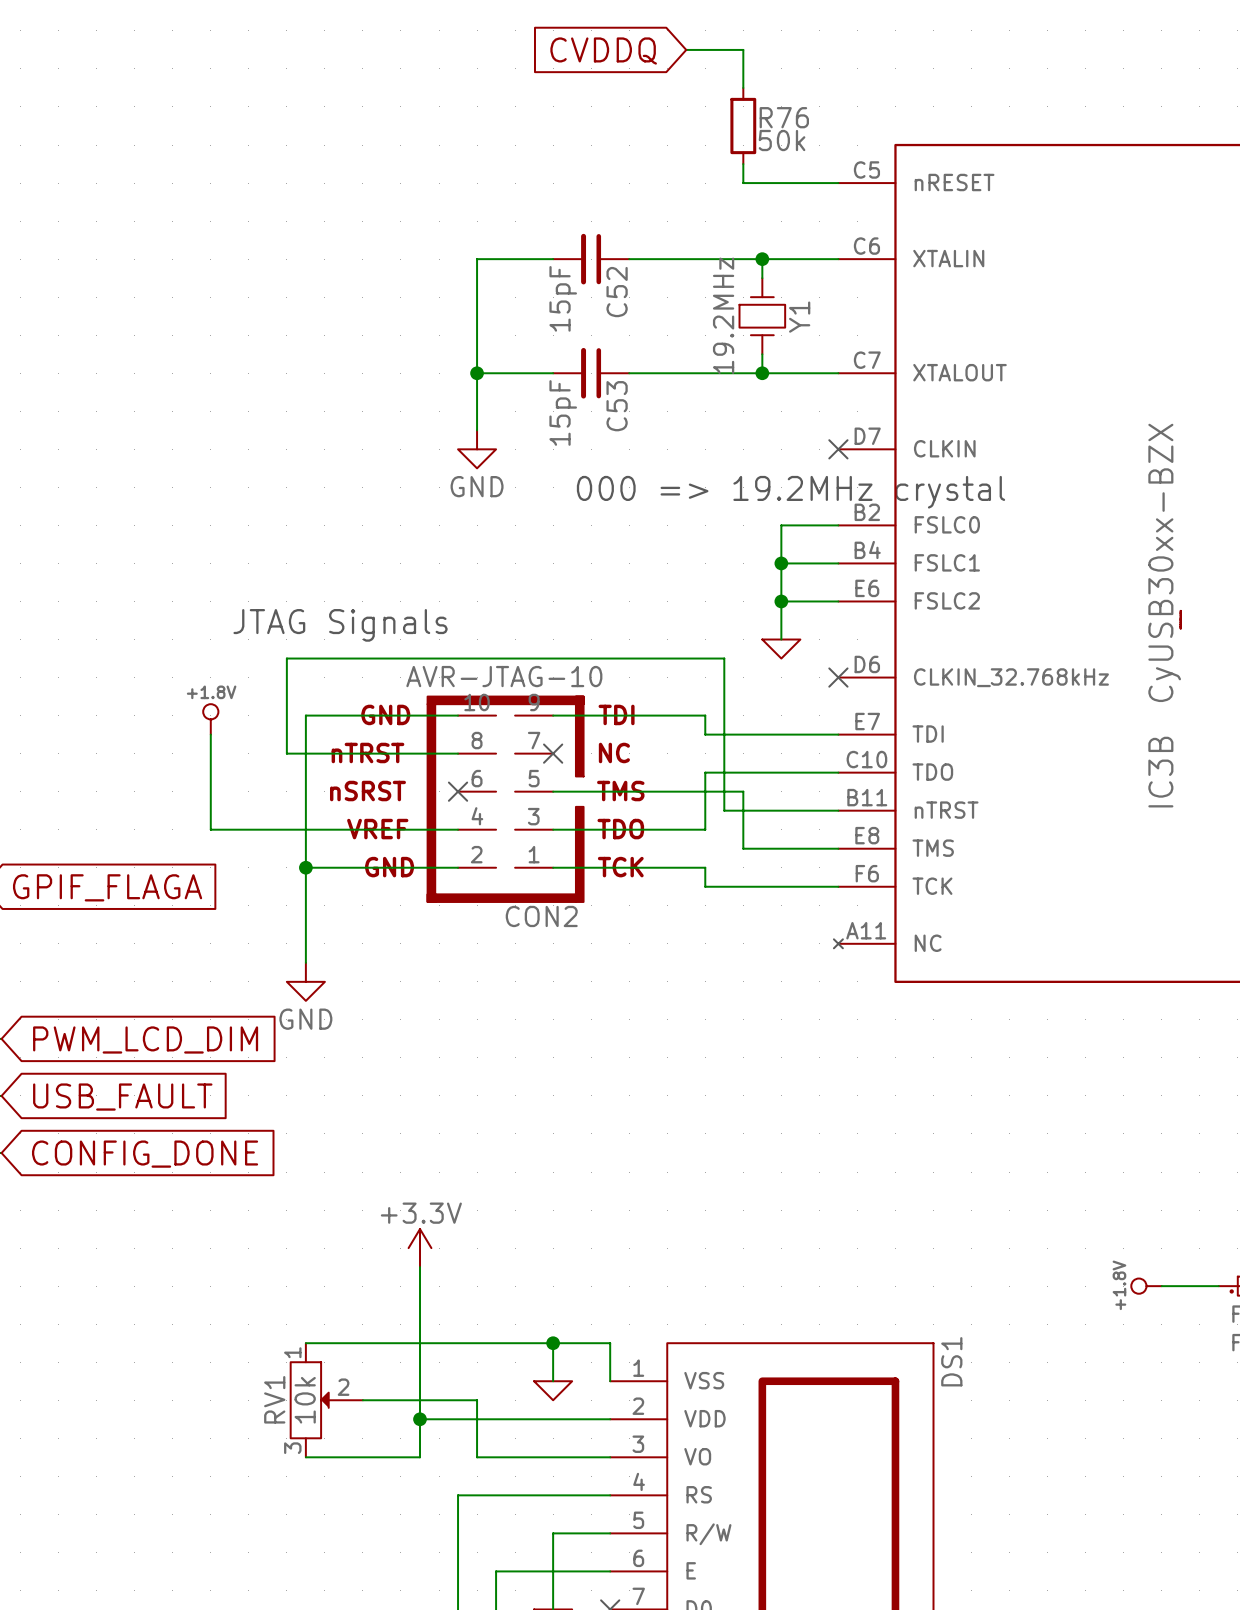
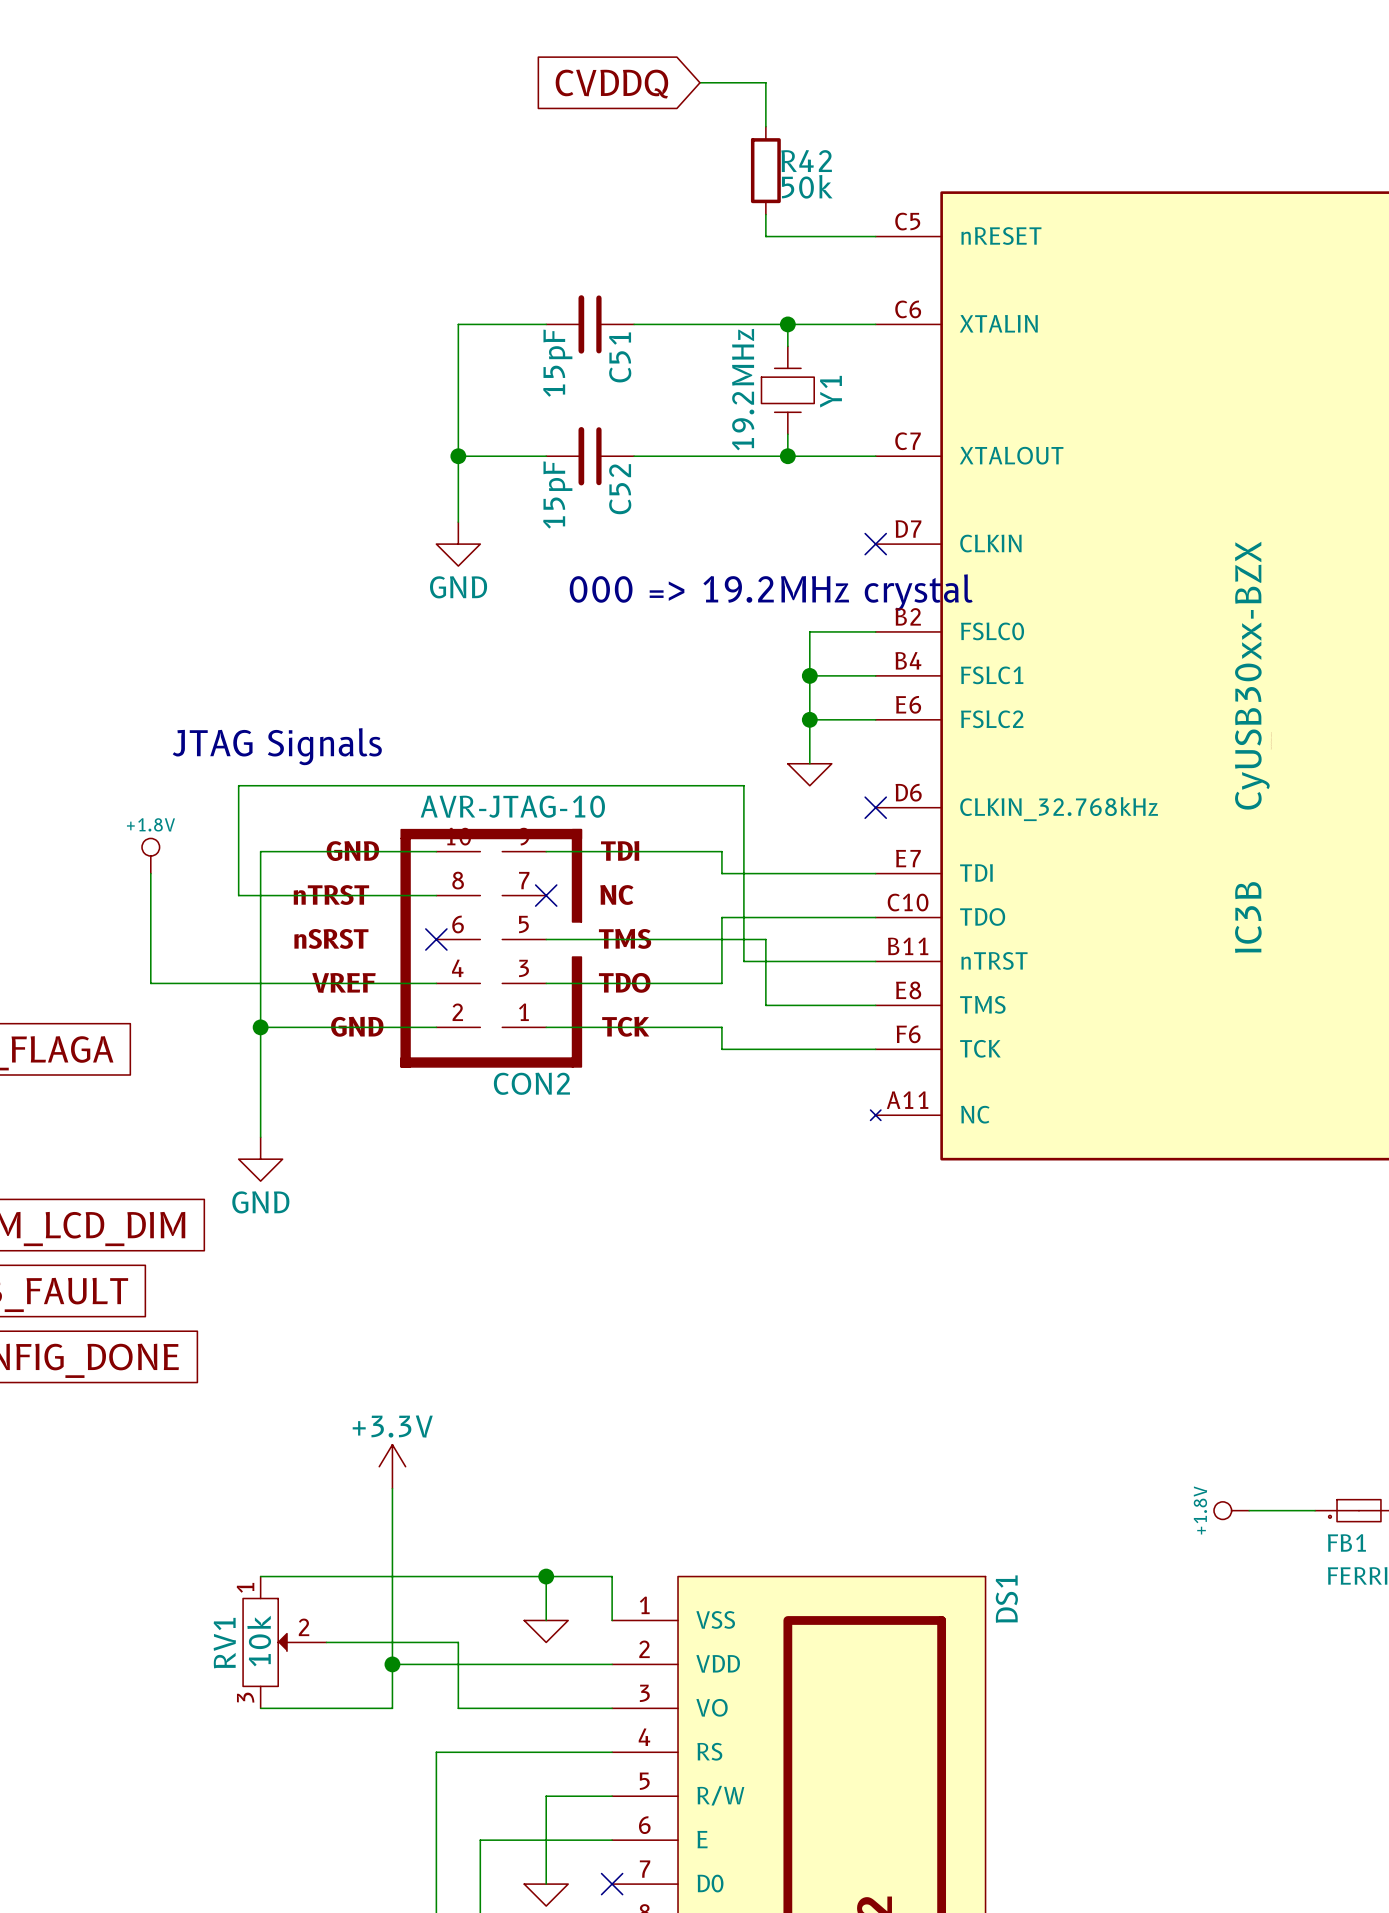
R76 name: R76 (784, 117) -> R42 (806, 161)
C52 name: C52 (617, 292) -> C51 (620, 357)
C53 name: C53 (617, 406) -> C52 (620, 489)

